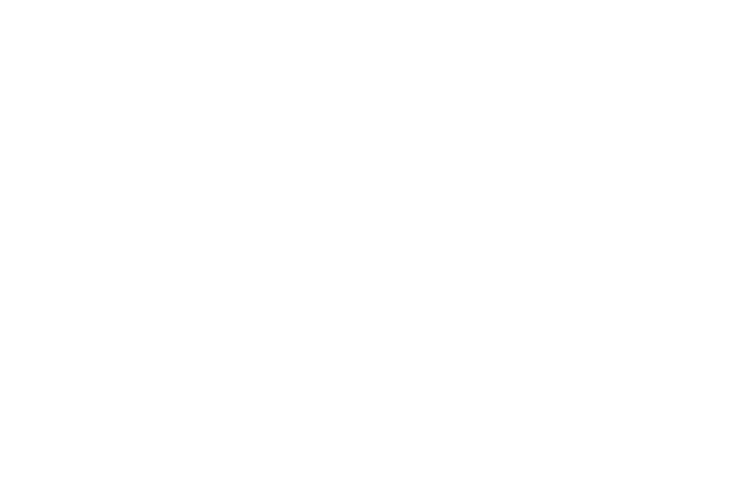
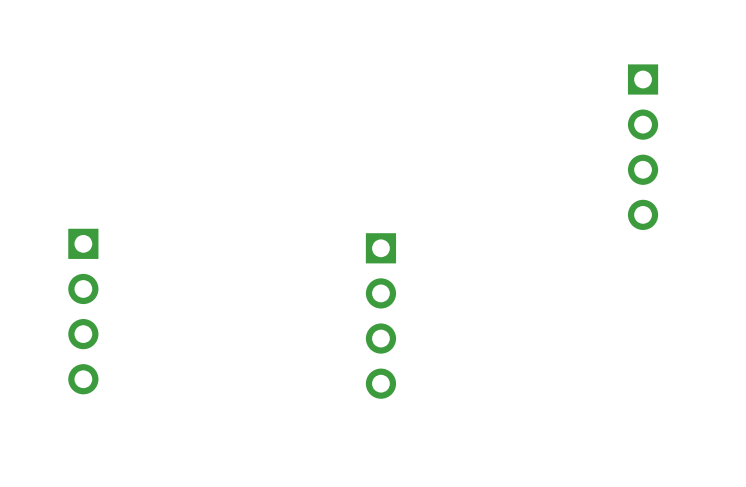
part: none -> (643, 147)
part: none -> (83, 311)
part: none -> (380, 315)

